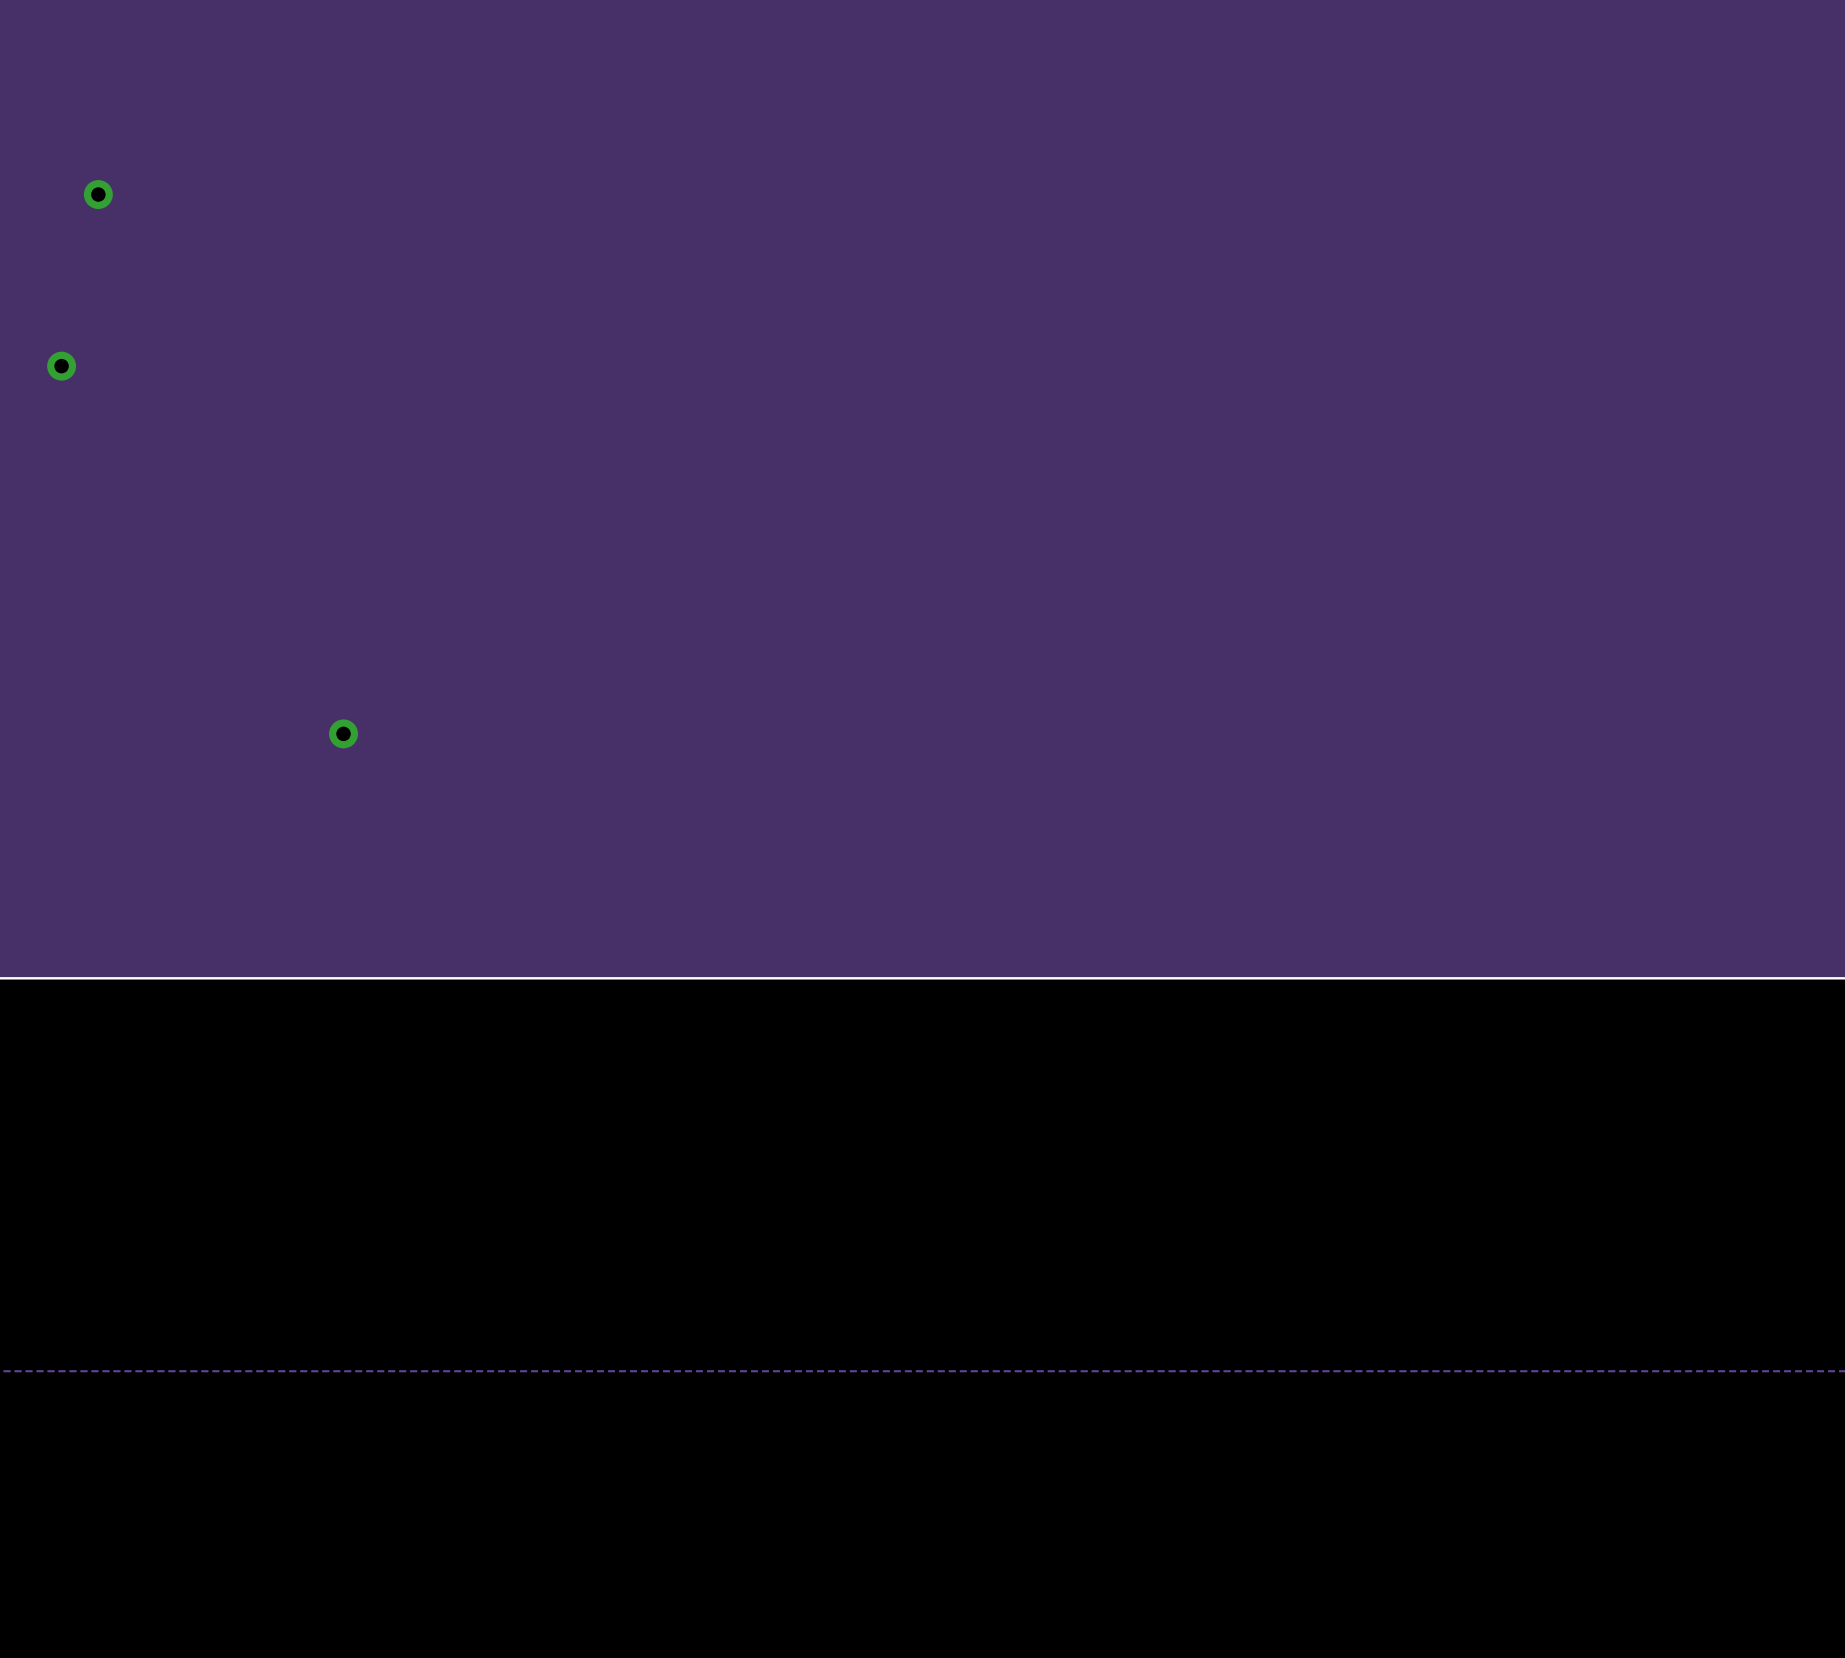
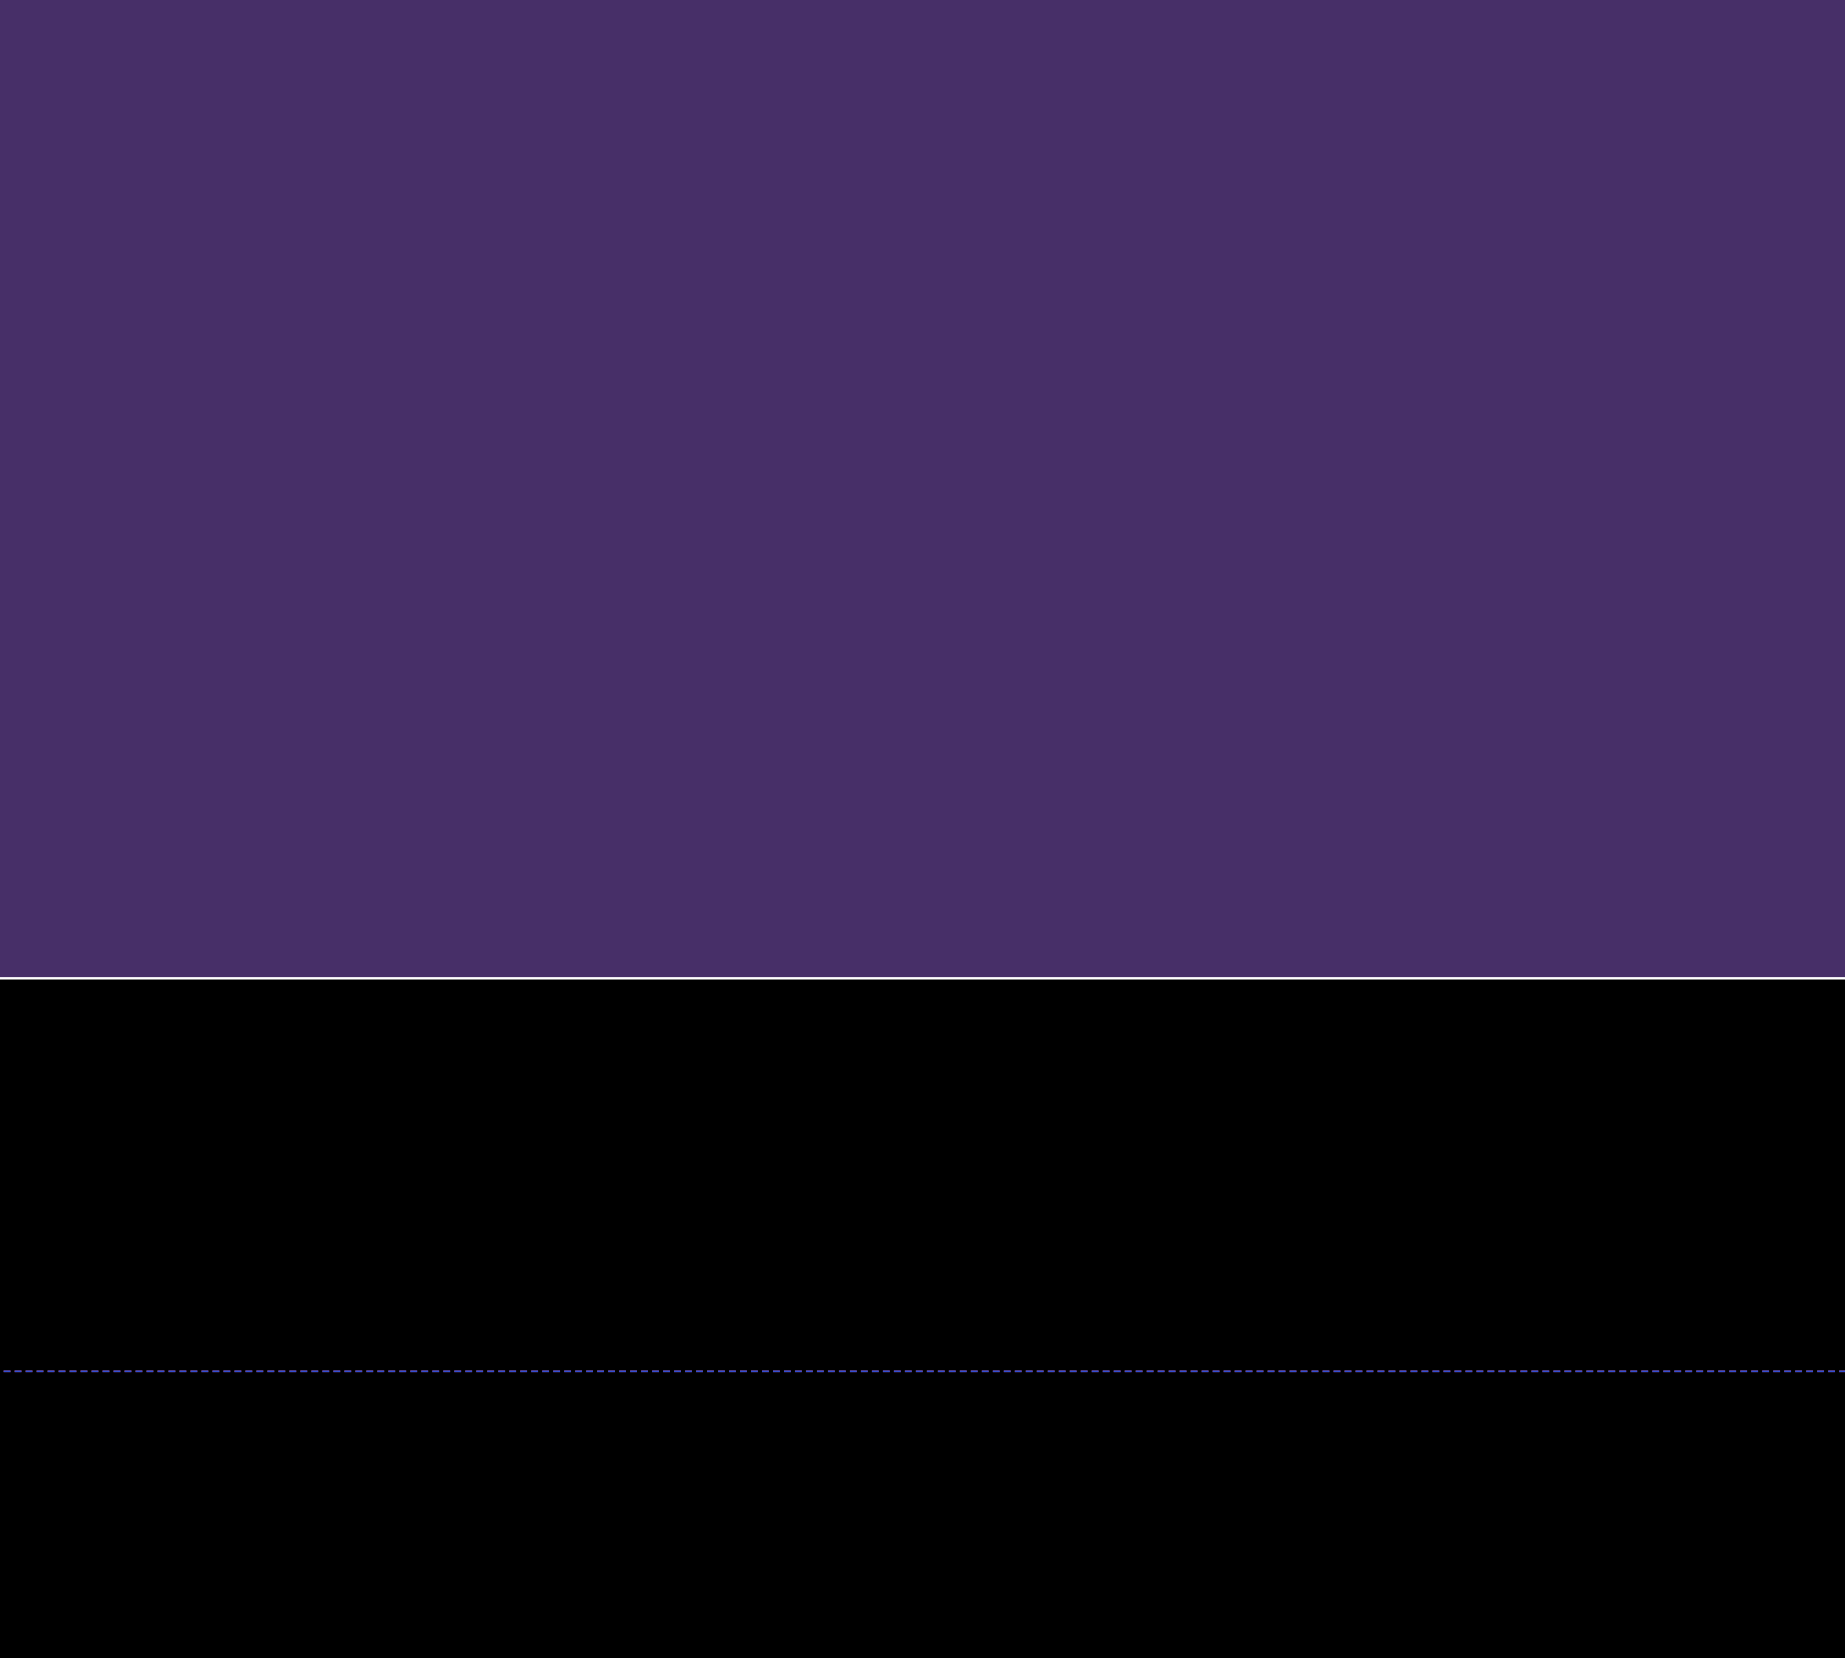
via: (98, 194) -> none
via: (61, 366) -> none
via: (343, 733) -> none

